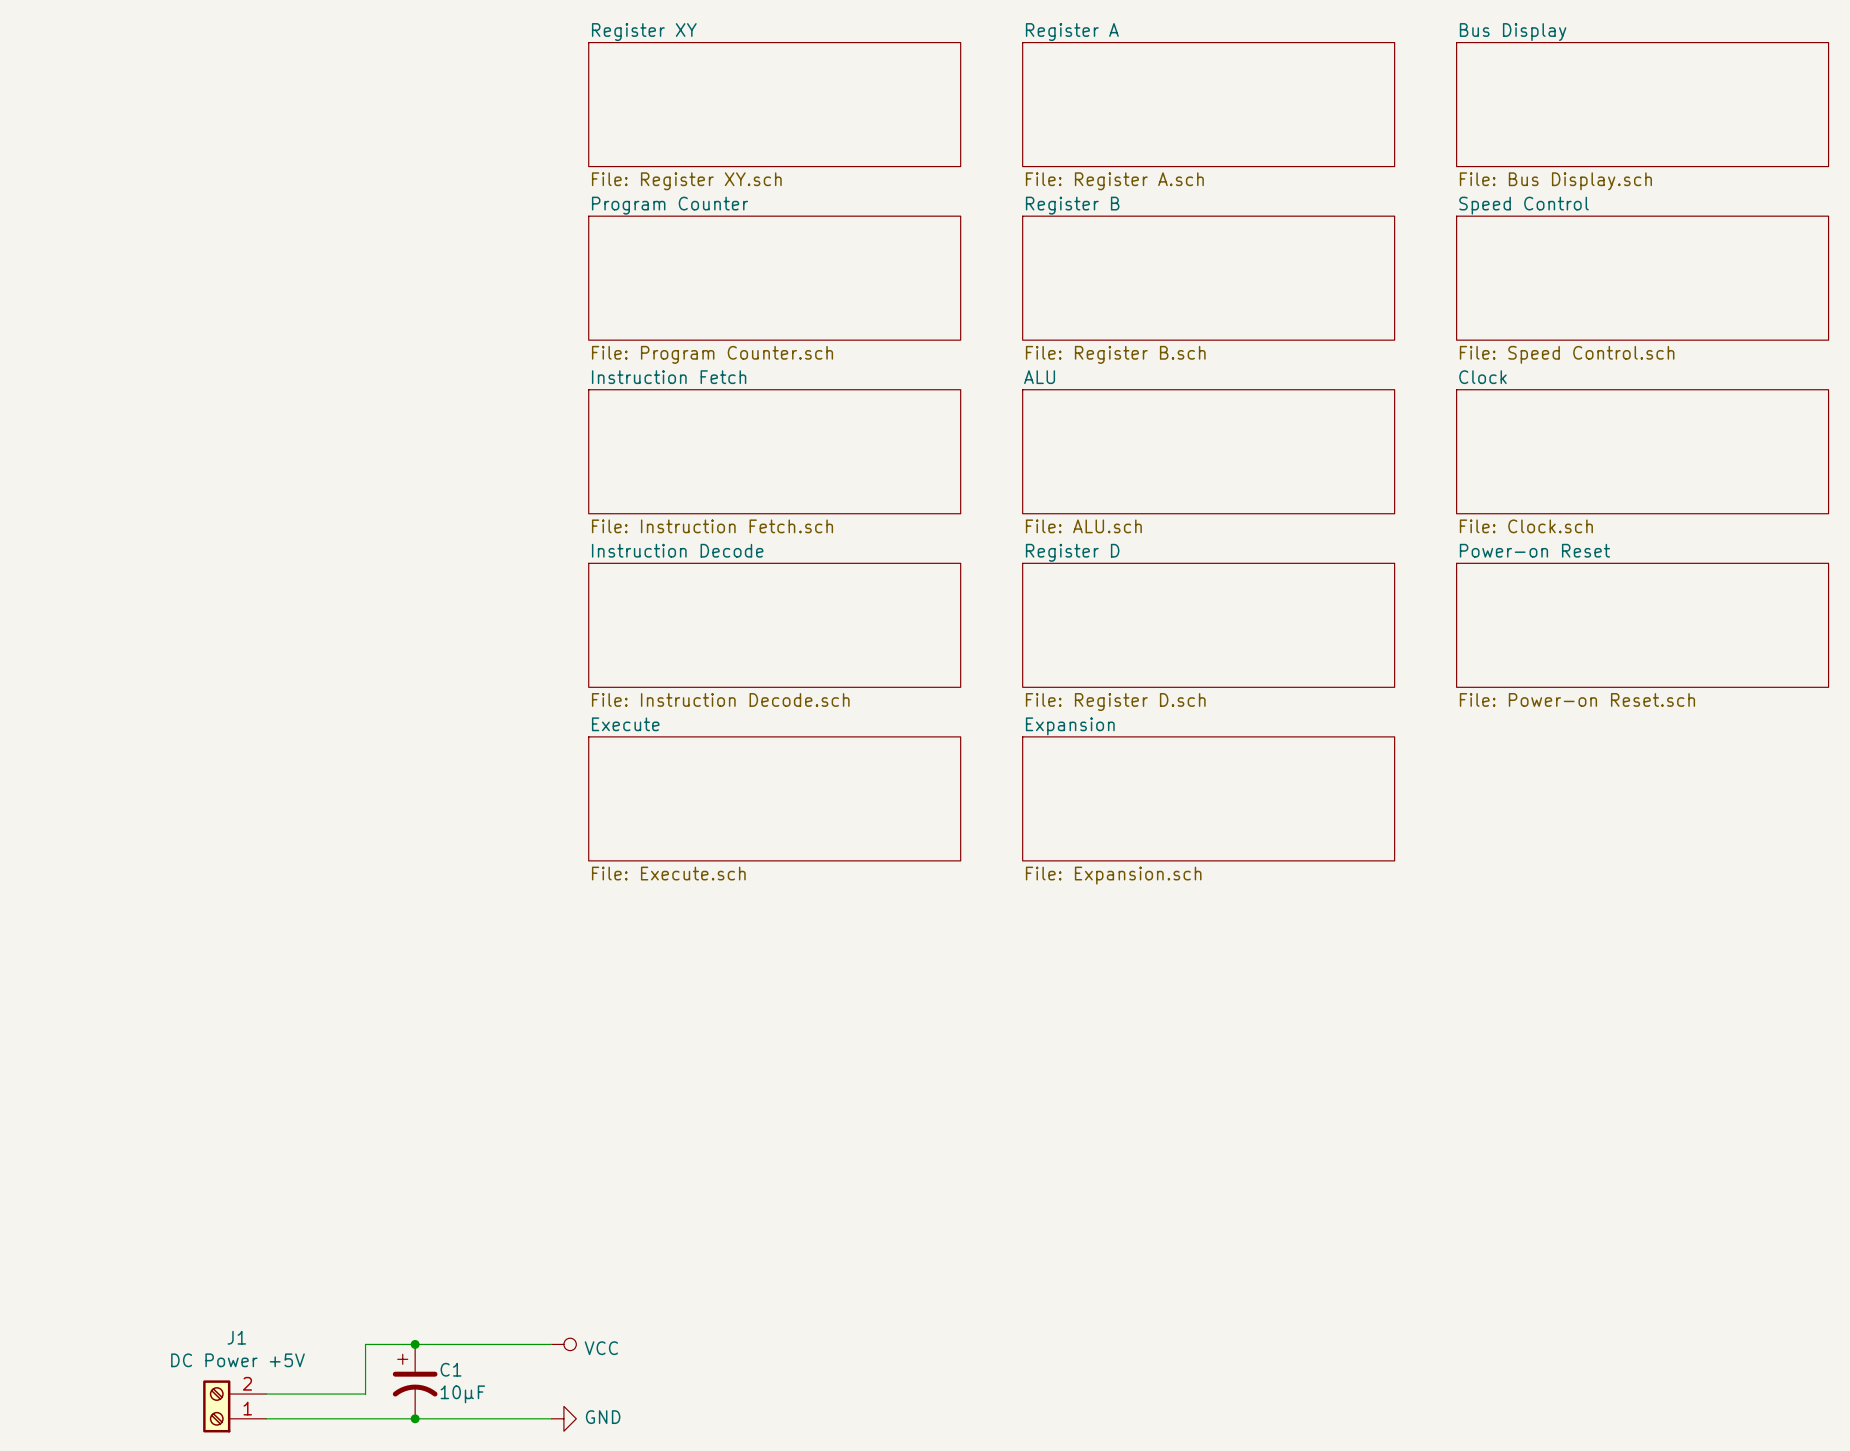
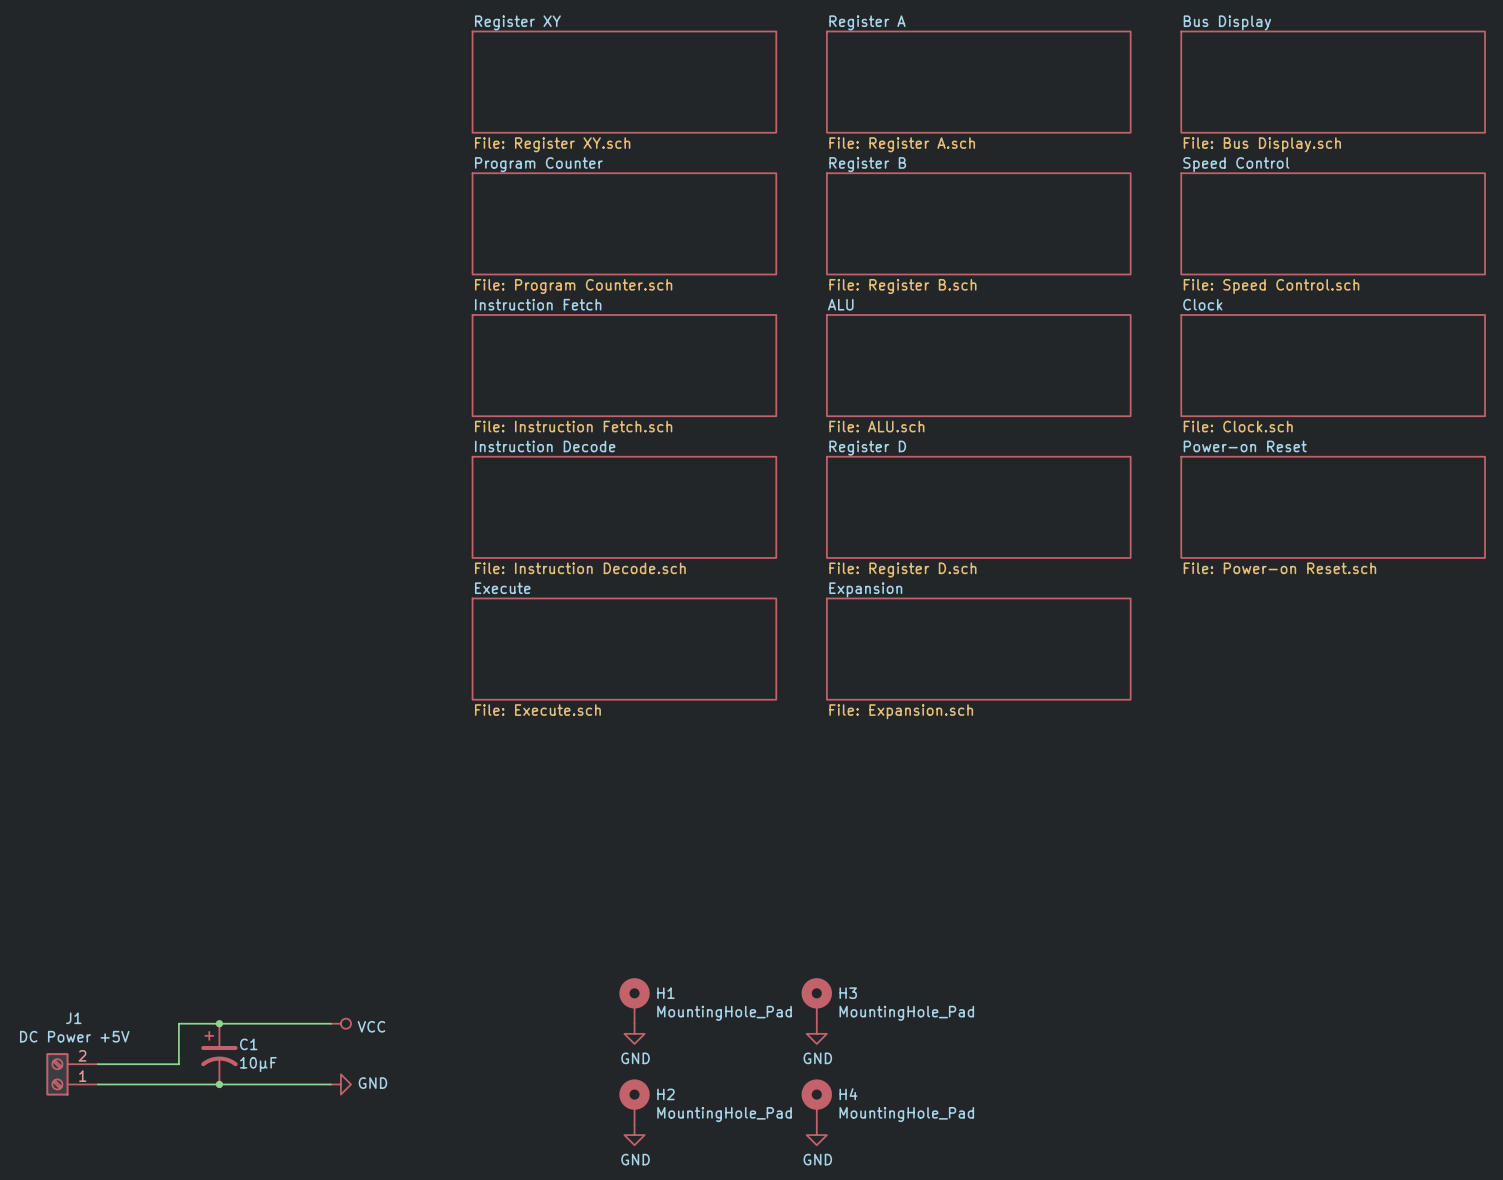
H1: none -> MountingHole_Pad (634, 1000)
H3: none -> MountingHole_Pad (816, 1000)
junction: none -> (219, 1023)
power symbol: none -> GND (634, 1033)
power symbol: none -> GND (816, 1033)
junction: none -> (219, 1084)
power symbol: none -> GND (340, 1084)
junction: (415, 1344) -> none
wire: (551, 1344) (365, 1344) (365, 1394) (266, 1394) -> (330, 1023) (178, 1023) (178, 1064) (97, 1064)
power symbol position: VCC (563, 1344) -> VCC (340, 1023)
H2: none -> MountingHole_Pad (634, 1102)
H4: none -> MountingHole_Pad (816, 1102)
C1 position: (415, 1381) -> (219, 1054)
power symbol: none -> GND (634, 1135)
power symbol: none -> GND (816, 1135)
J1 position: (234, 1406) -> (72, 1074)
wire: (266, 1418) (551, 1418) -> (97, 1084) (330, 1084)
junction: (415, 1418) -> none
power symbol: GND (563, 1418) -> none

